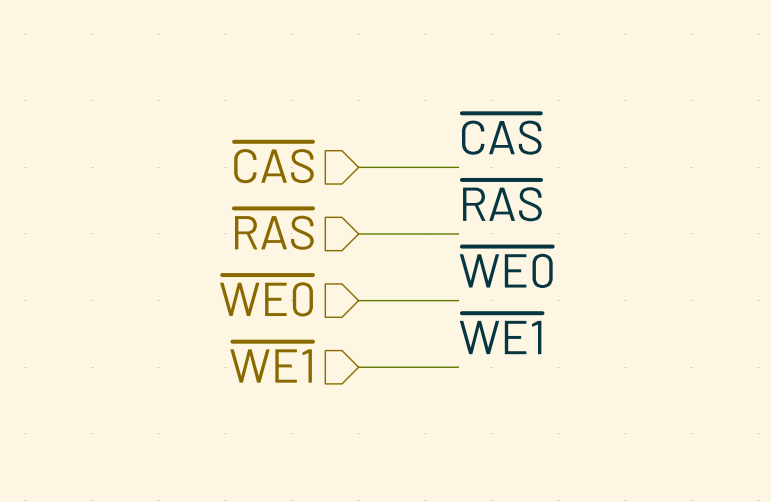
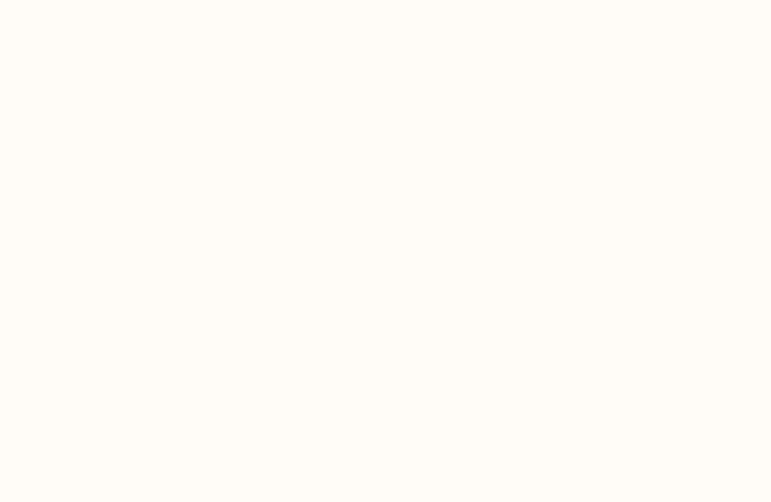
label: ~{CAS} (501, 134) -> none
hierarchical label: ~{CAS} (273, 162) -> none
wire: (358, 167) (458, 167) -> none
label: ~{RAS} (501, 200) -> none
hierarchical label: ~{RAS} (273, 229) -> none
wire: (358, 233) (458, 233) -> none
label: ~{WE0} (506, 267) -> none
hierarchical label: ~{WE0} (266, 295) -> none
wire: (358, 300) (458, 300) -> none
label: ~{WE1} (501, 333) -> none
hierarchical label: ~{WE1} (271, 362) -> none
wire: (358, 367) (458, 367) -> none

